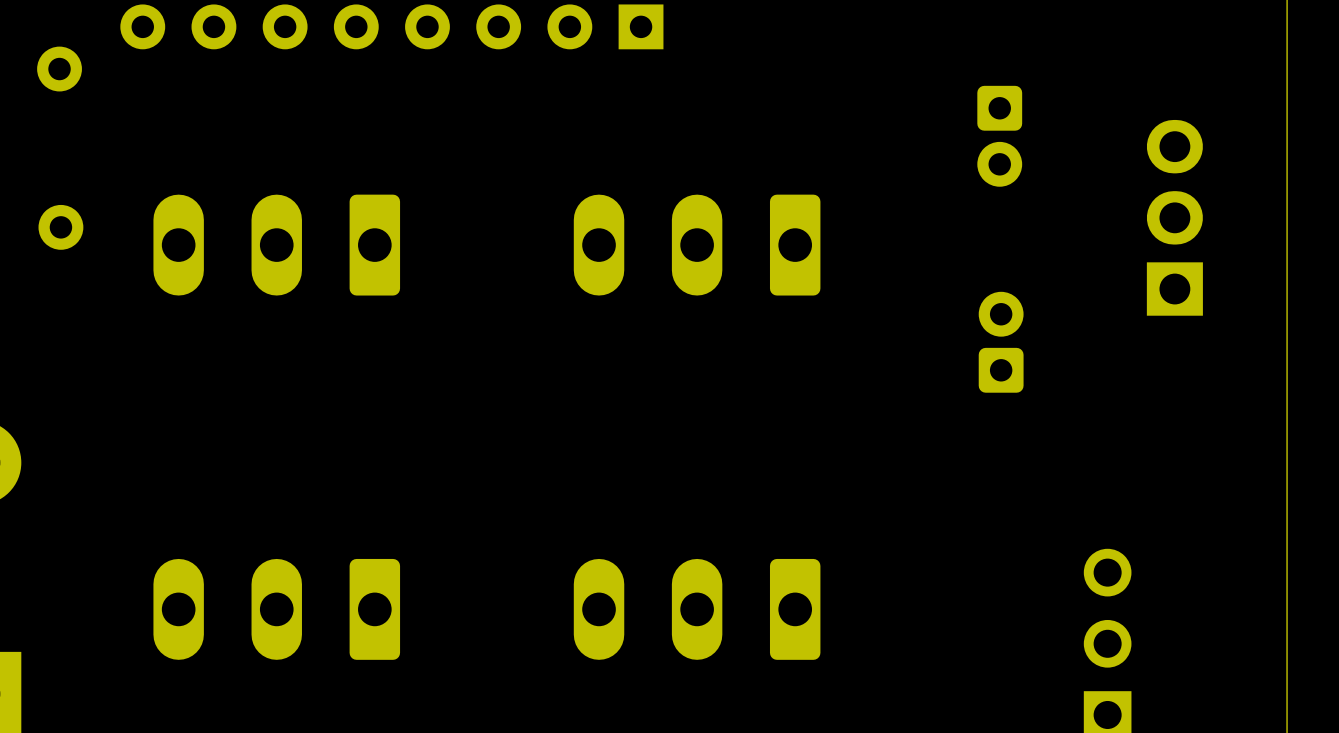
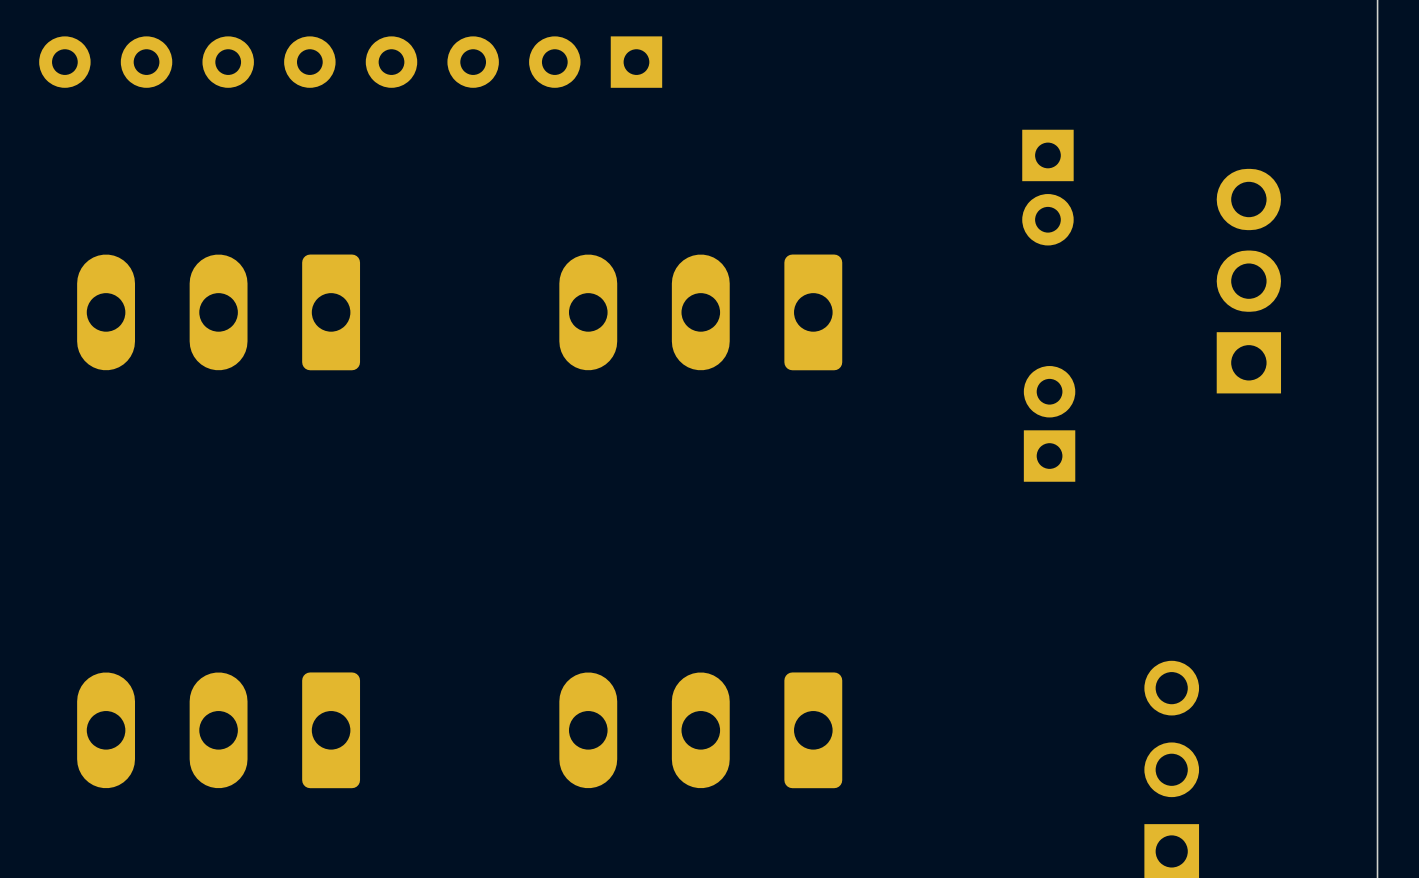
part footprint: [977, 85, 1023, 187] -> [1022, 129, 1074, 246]
part footprint: [978, 291, 1024, 393] -> [1023, 366, 1076, 482]

